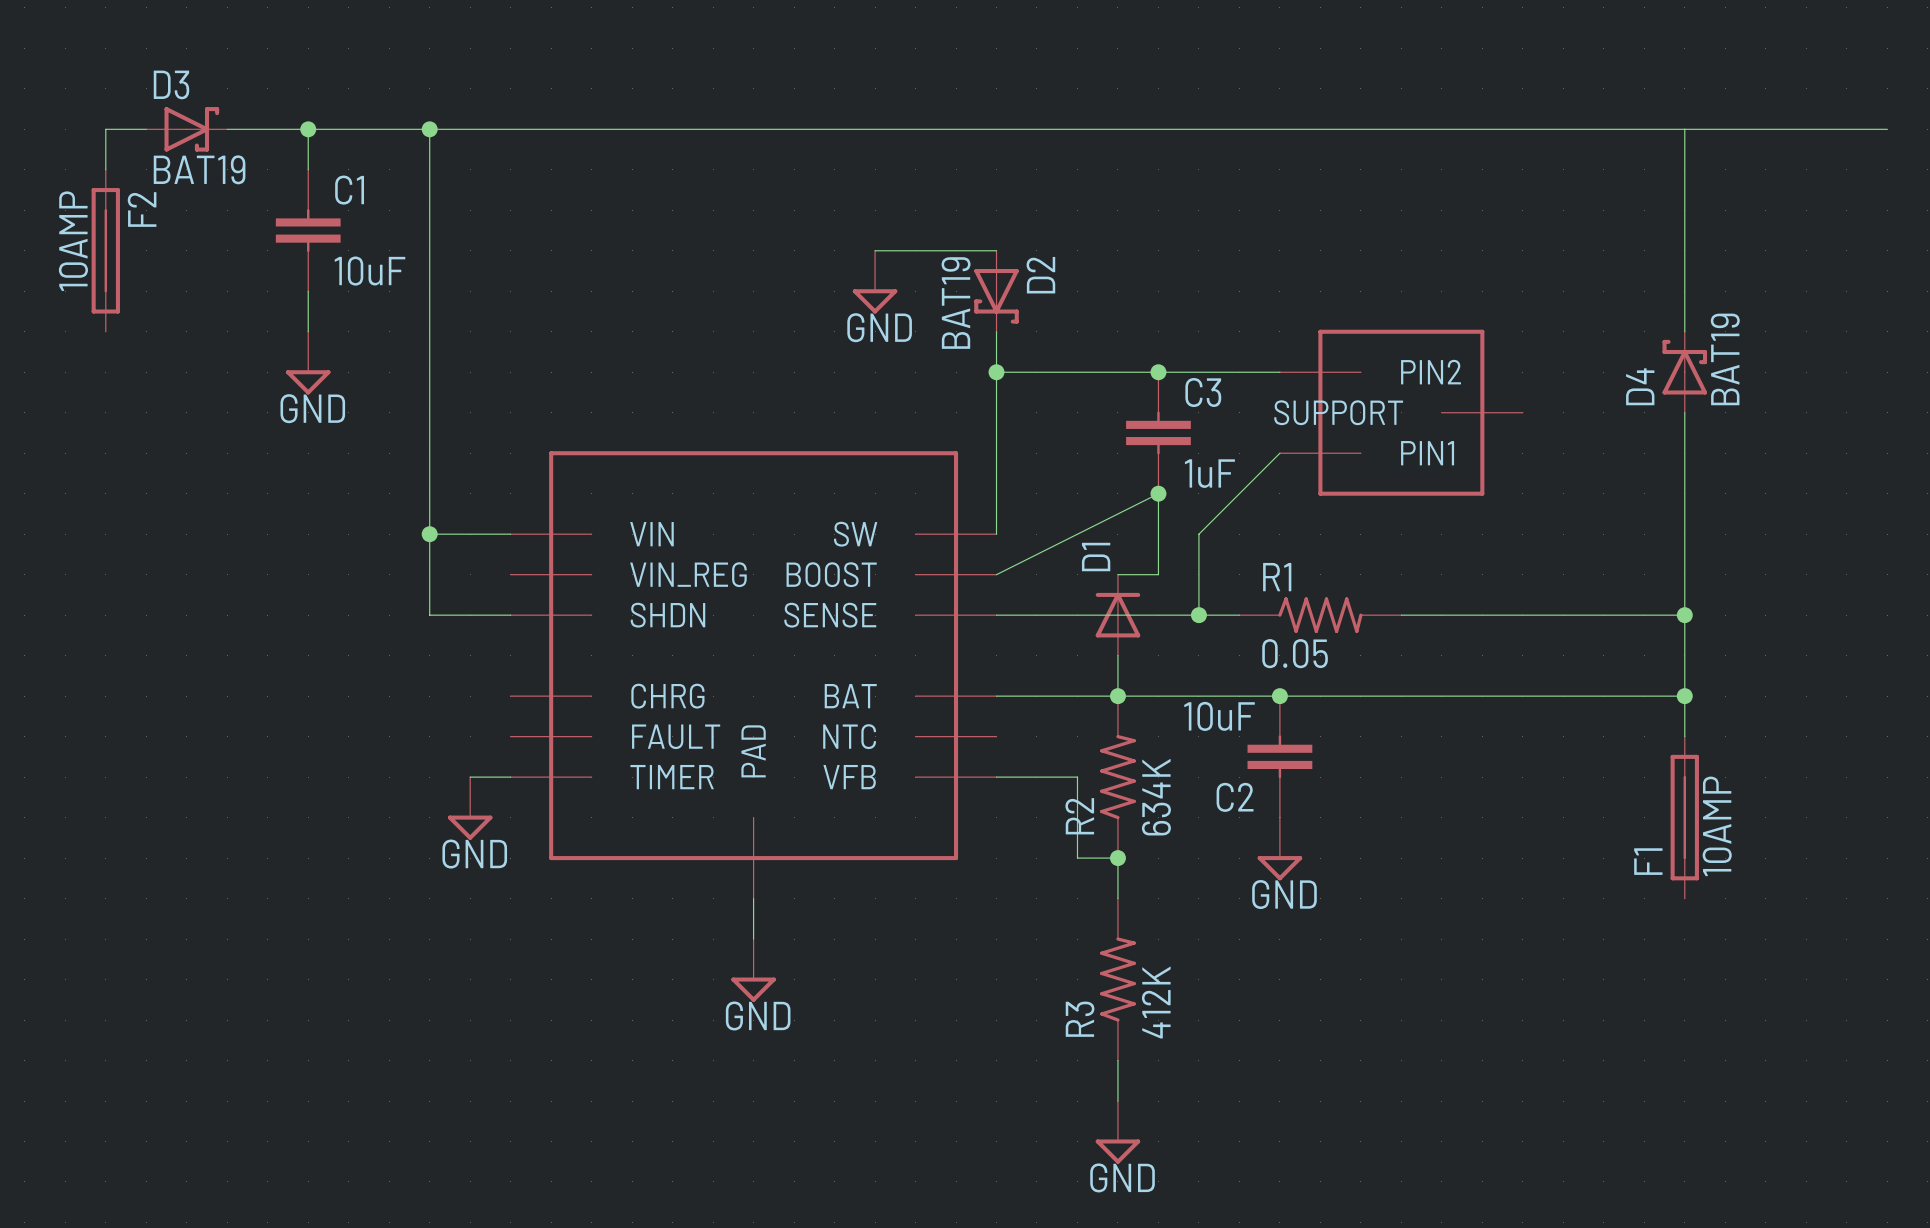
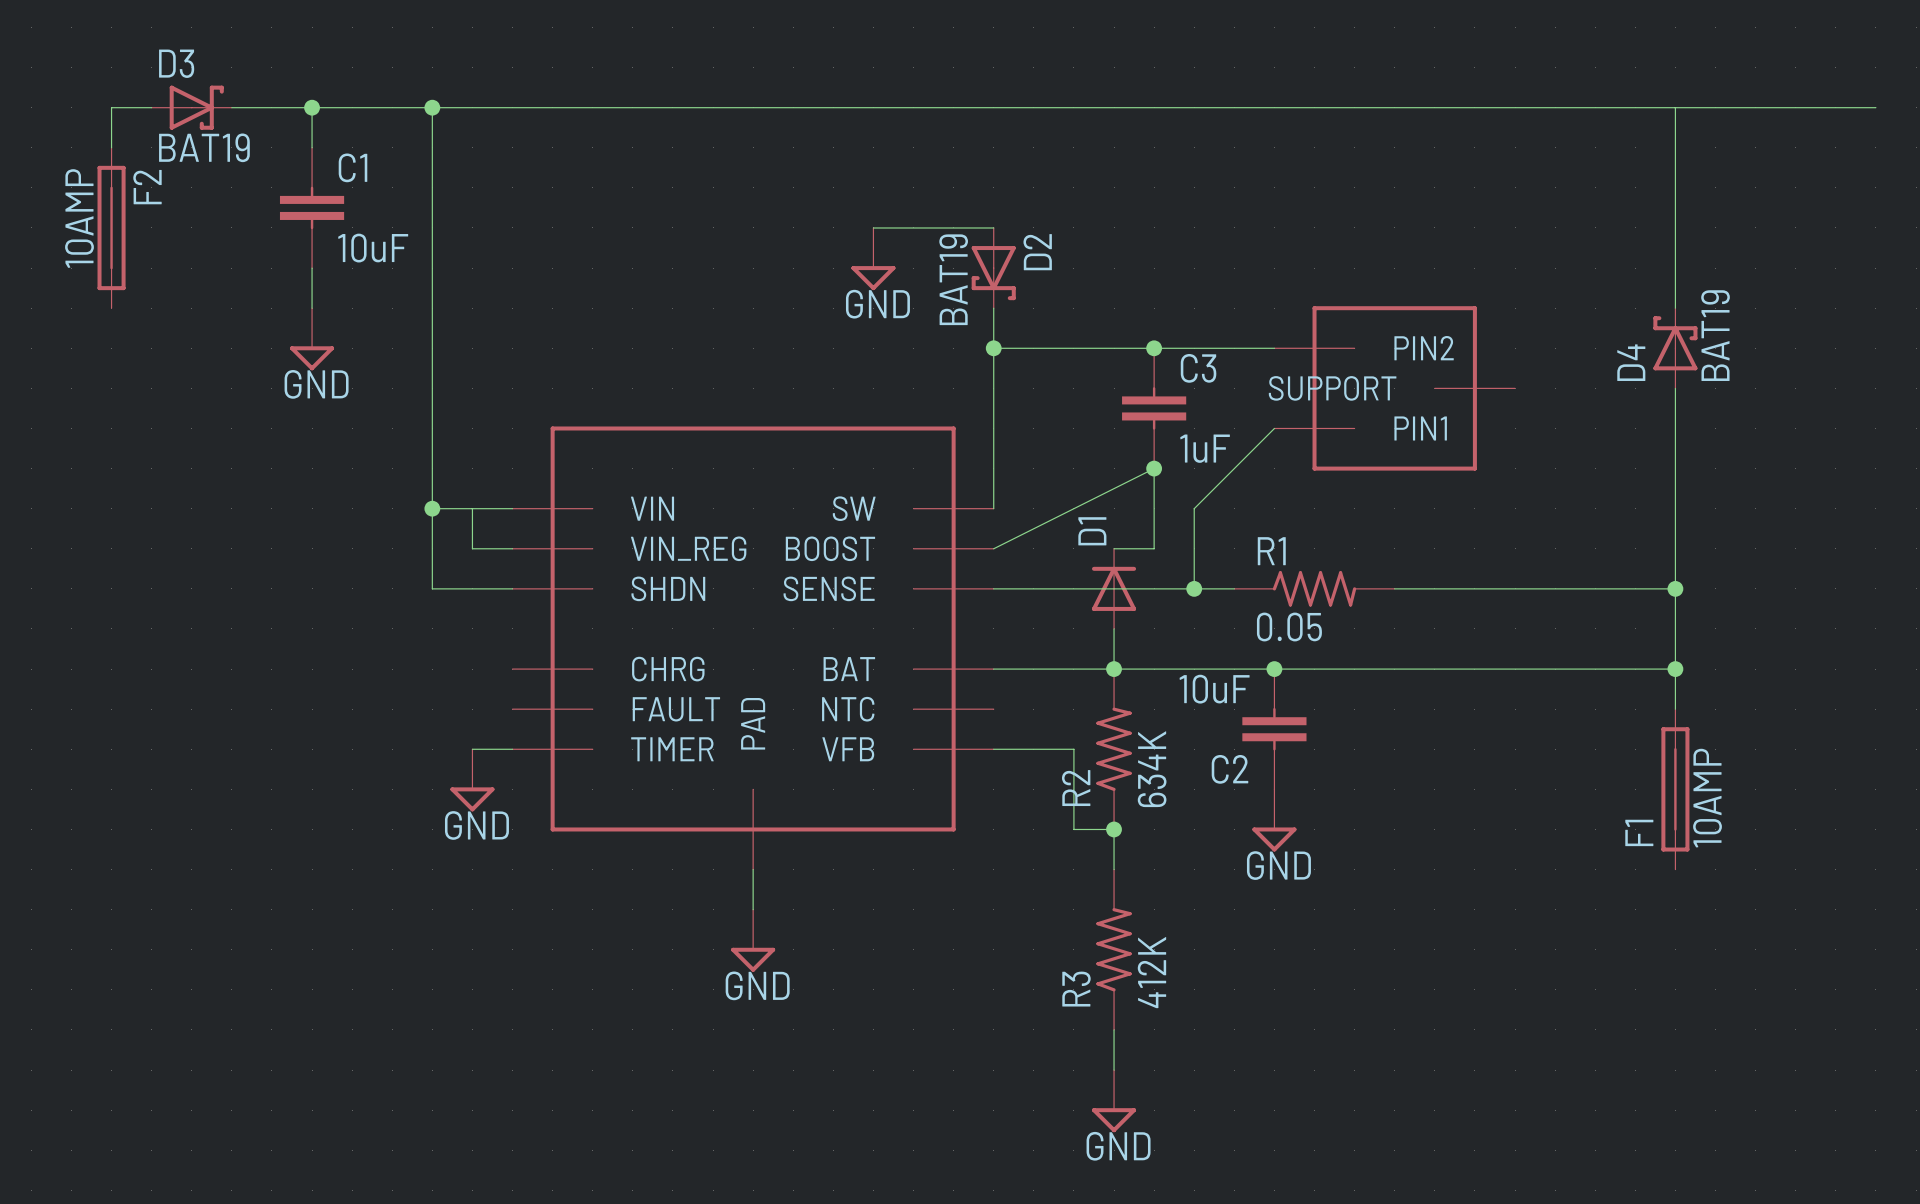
wire: none -> (472, 508) (472, 548) (512, 548)

